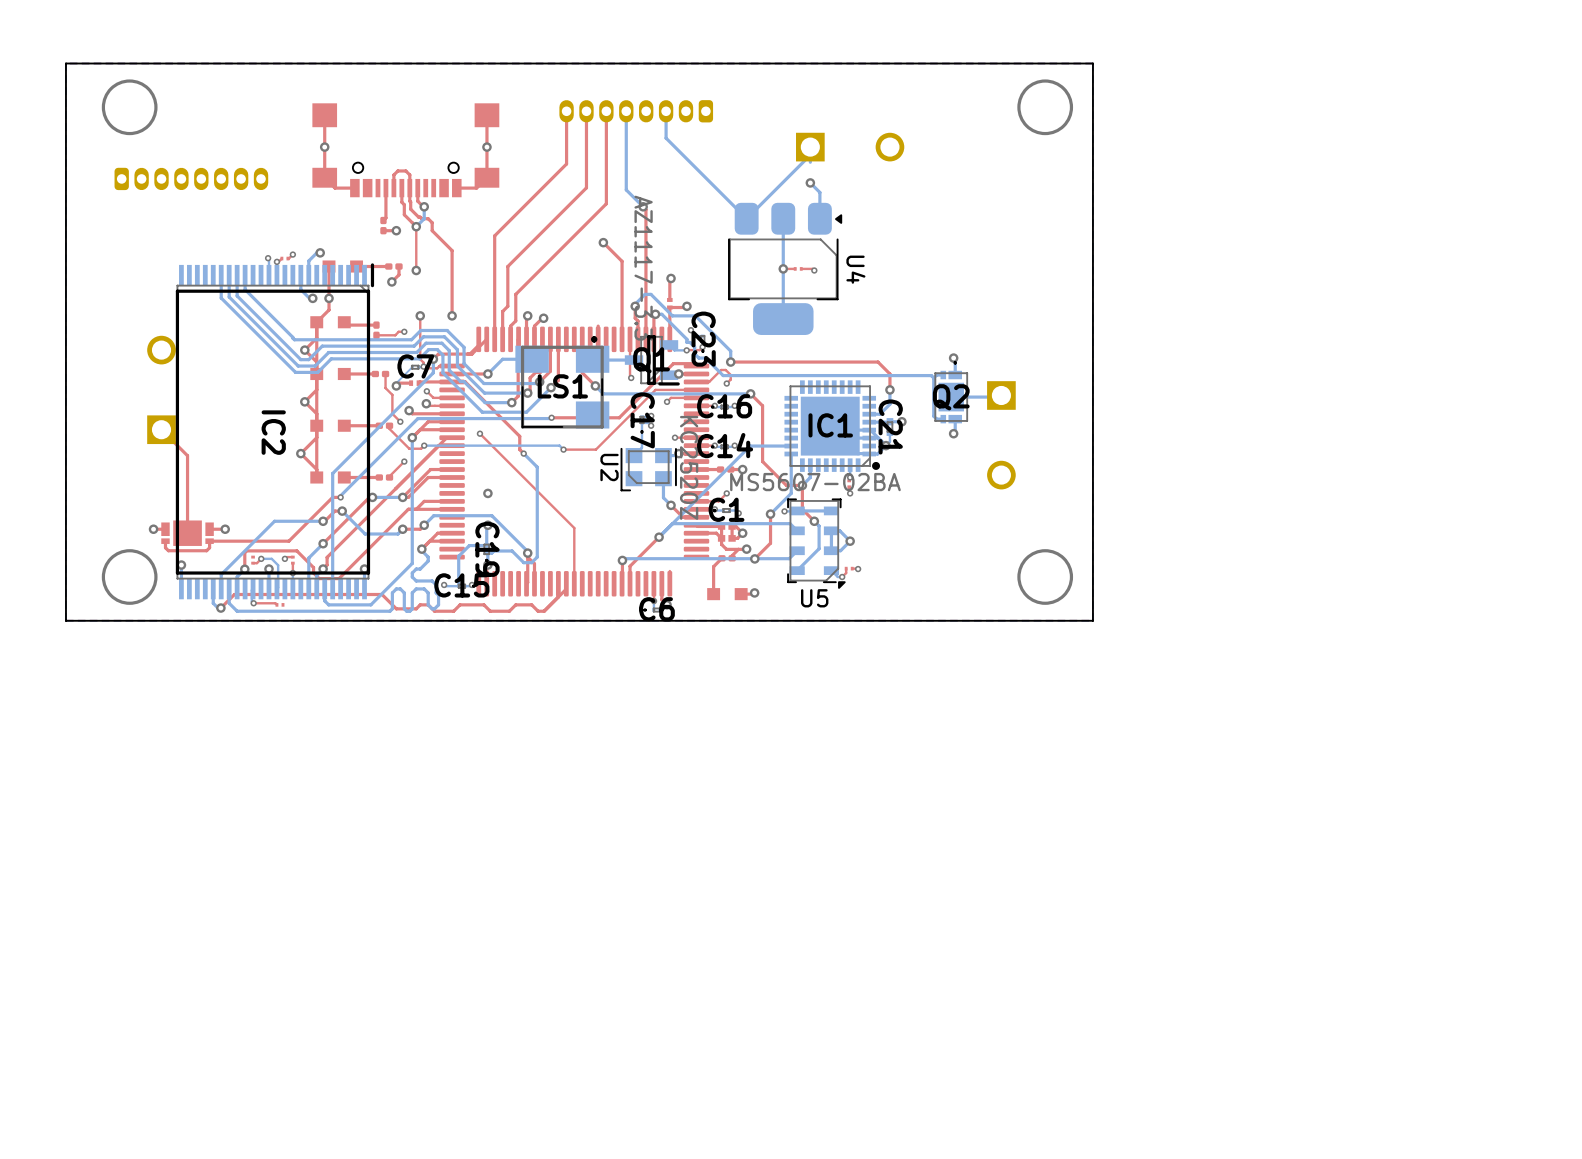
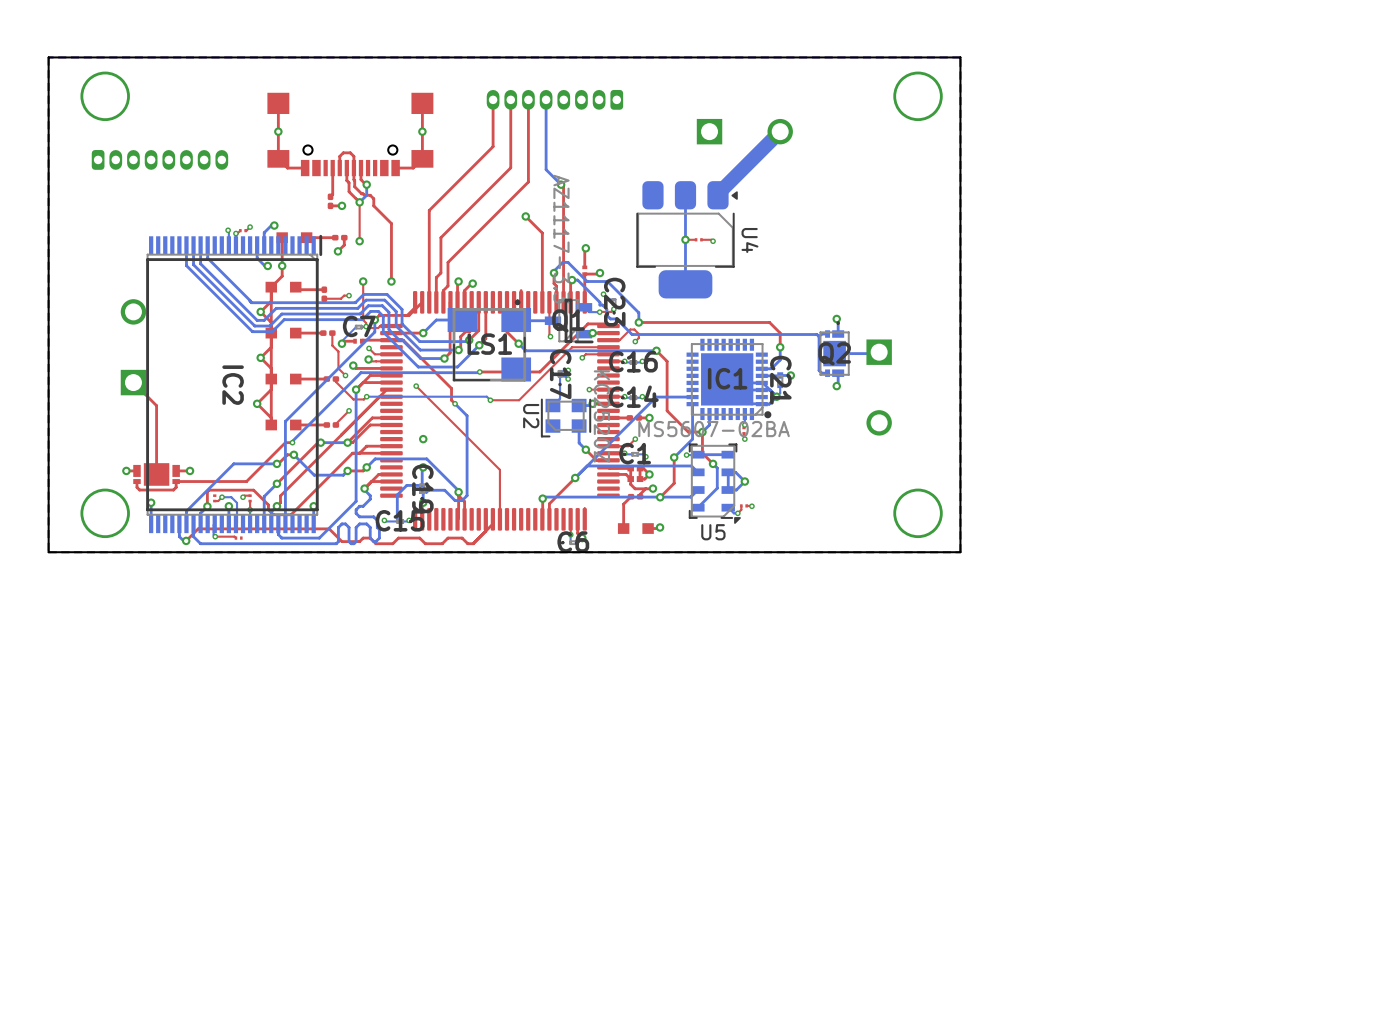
bottom track: (666, 111) (666, 138) (746, 218) (810, 155) (810, 162) -> none
bottom track: (810, 182) (819, 192) (819, 217) -> (780, 131) (718, 193)
via: (810, 182) -> none

